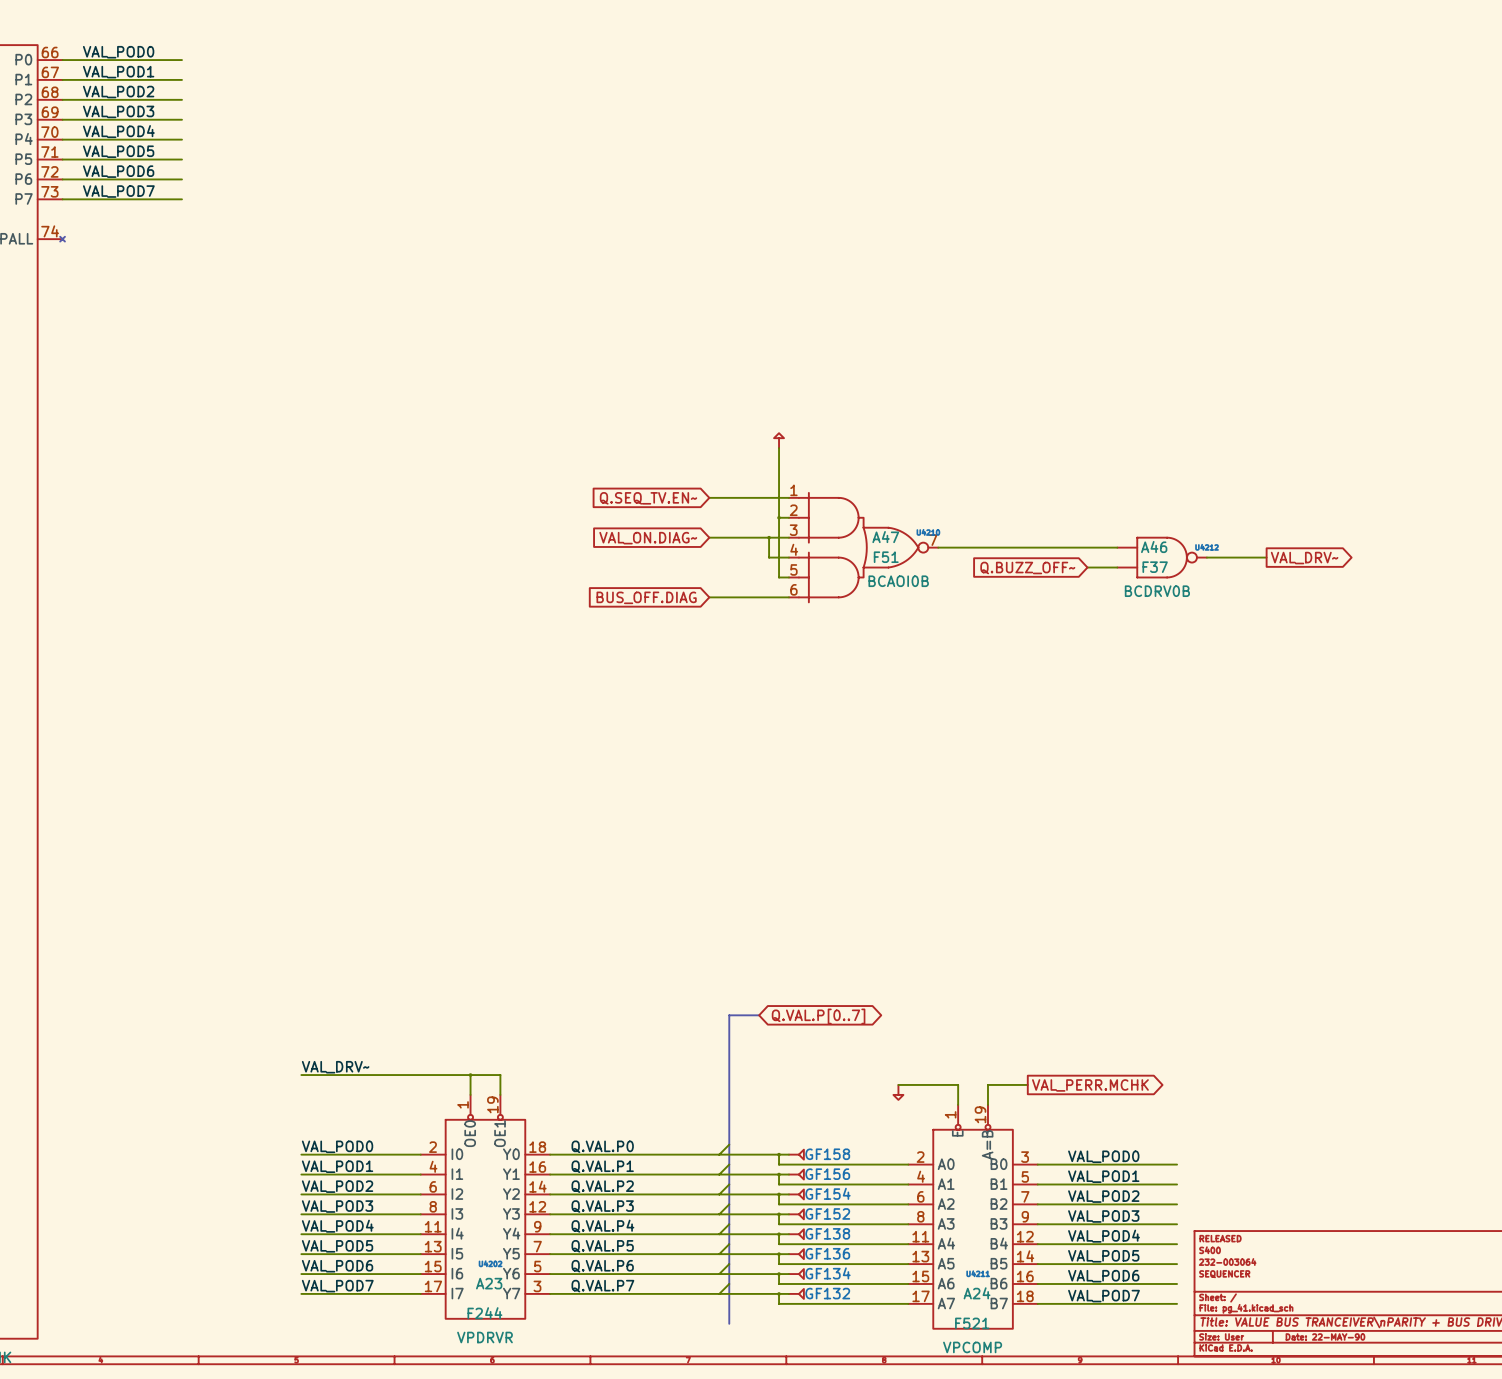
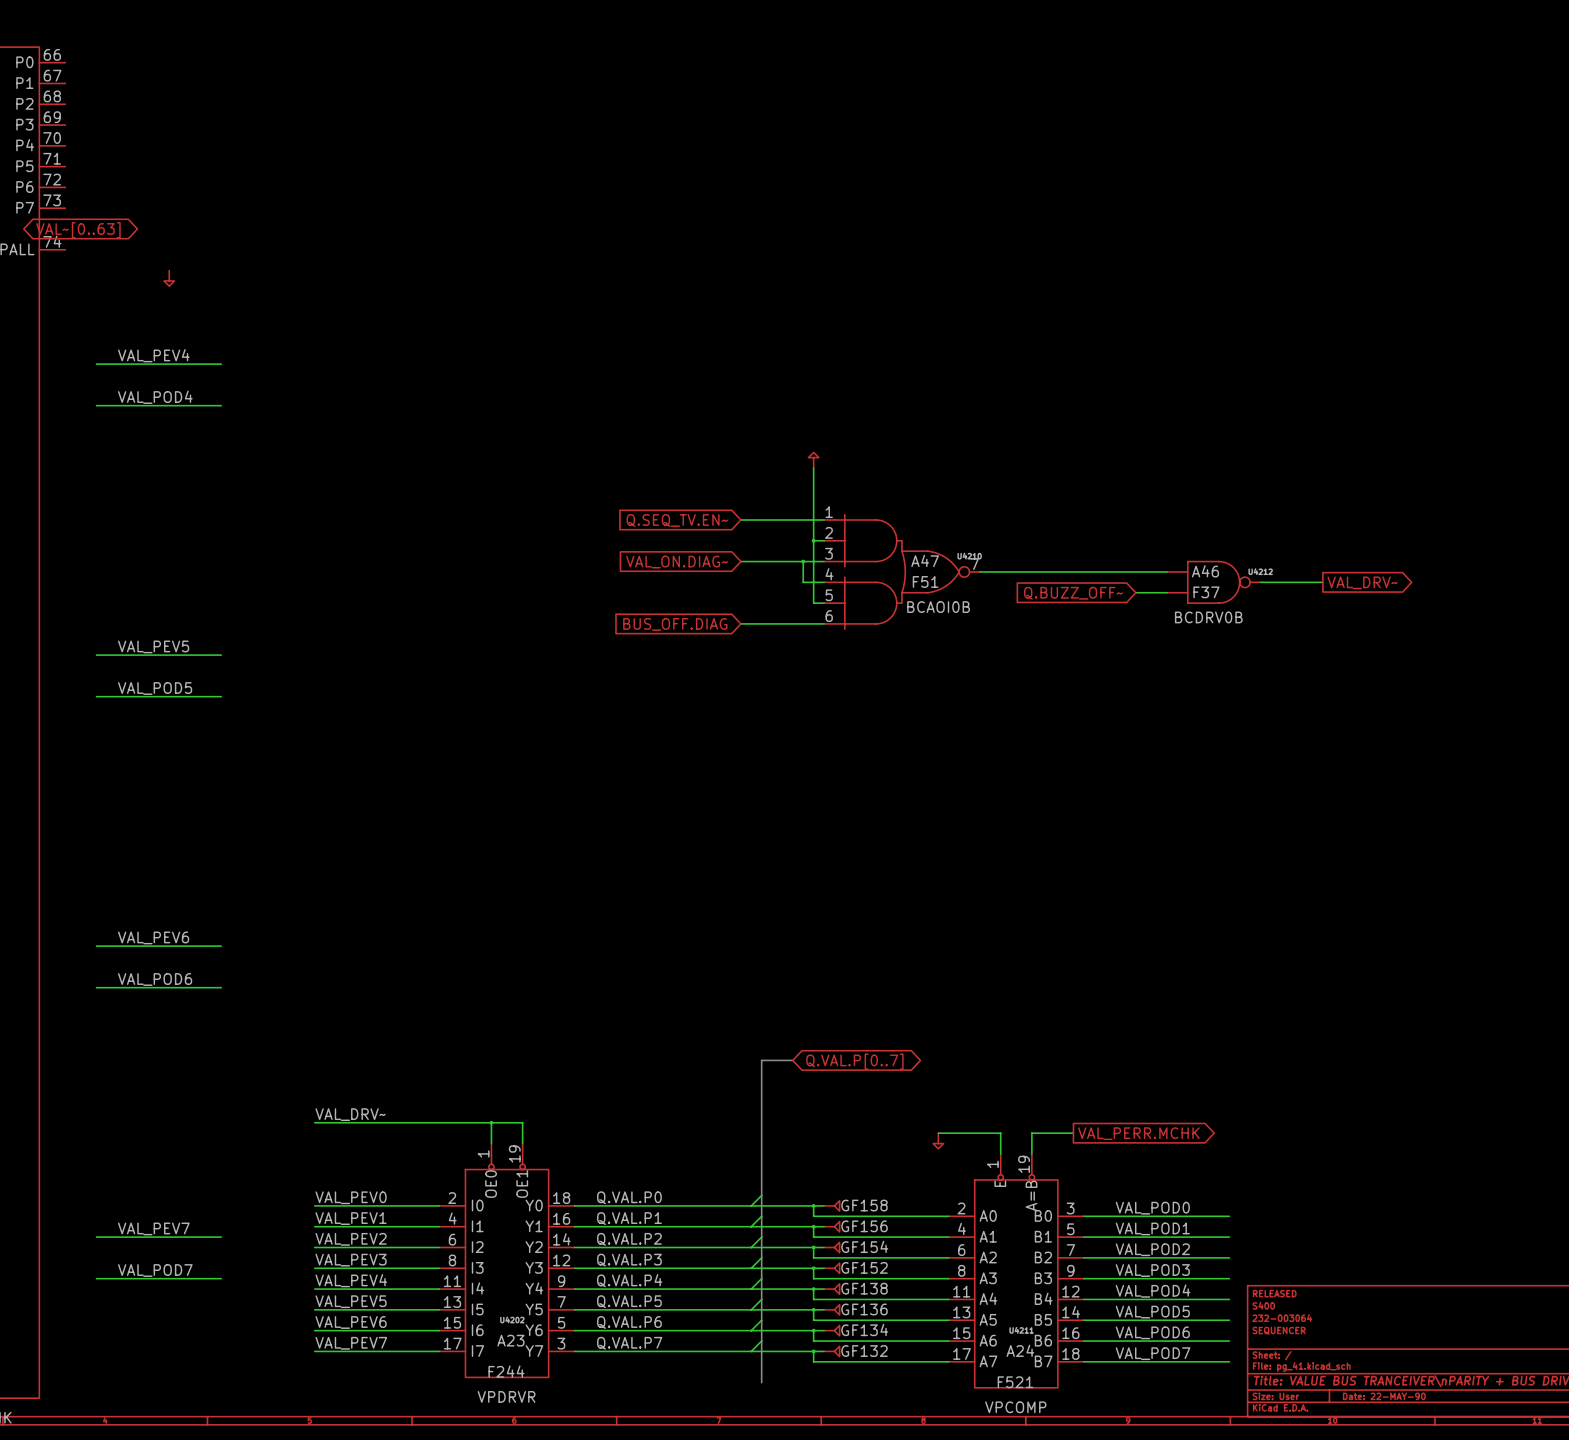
label: VAL_POD0 (118, 52) -> none
wire: (62, 60) (181, 60) -> none
label: VAL_POD1 (118, 72) -> none
wire: (62, 79) (181, 79) -> none
label: VAL_POD2 (118, 92) -> none
wire: (62, 99) (181, 99) -> none
label: VAL_POD3 (118, 111) -> none
wire: (62, 119) (181, 119) -> none
label: VAL_POD4 (118, 131) -> none
wire: (62, 139) (181, 139) -> none
label: VAL_POD5 (118, 151) -> none
wire: (62, 159) (181, 159) -> none
label: VAL_POD6 (118, 171) -> none
wire: (62, 179) (181, 179) -> none
label: VAL_POD7 (118, 191) -> none
wire: (62, 199) (181, 199) -> none
global label: none -> VAL~[0..63] (78, 230)
no-connect mark: (62, 239) -> none
power symbol: none -> (169, 278)
label: none -> VAL_PEV4 (153, 355)
wire: none -> (96, 364) (221, 364)
label: none -> VAL_POD4 (155, 397)
wire: none -> (96, 405) (221, 405)
label: none -> VAL_PEV5 (153, 646)
wire: none -> (96, 655) (221, 655)
label: none -> VAL_POD5 (155, 688)
wire: none -> (96, 696) (221, 696)
label: none -> VAL_PEV6 (153, 937)
wire: none -> (96, 946) (221, 946)
label: none -> VAL_POD6 (155, 979)
wire: none -> (96, 987) (221, 987)
label: VAL_POD0 (337, 1146) -> VAL_PEV0 (351, 1197)
label: VAL_POD1 (337, 1166) -> VAL_PEV1 (351, 1218)
label: none -> VAL_PEV7 (153, 1228)
wire: none -> (96, 1237) (221, 1237)
label: VAL_POD2 (337, 1186) -> VAL_PEV2 (351, 1239)
label: VAL_POD3 (337, 1206) -> VAL_PEV3 (351, 1260)
label: none -> VAL_POD7 (155, 1270)
wire: none -> (96, 1278) (221, 1278)
label: VAL_POD4 (337, 1226) -> VAL_PEV4 (351, 1280)
label: VAL_POD5 (337, 1246) -> VAL_PEV5 (351, 1301)
label: VAL_POD6 (337, 1266) -> VAL_PEV6 (351, 1322)
label: VAL_POD7 (337, 1286) -> VAL_PEV7 (351, 1343)

